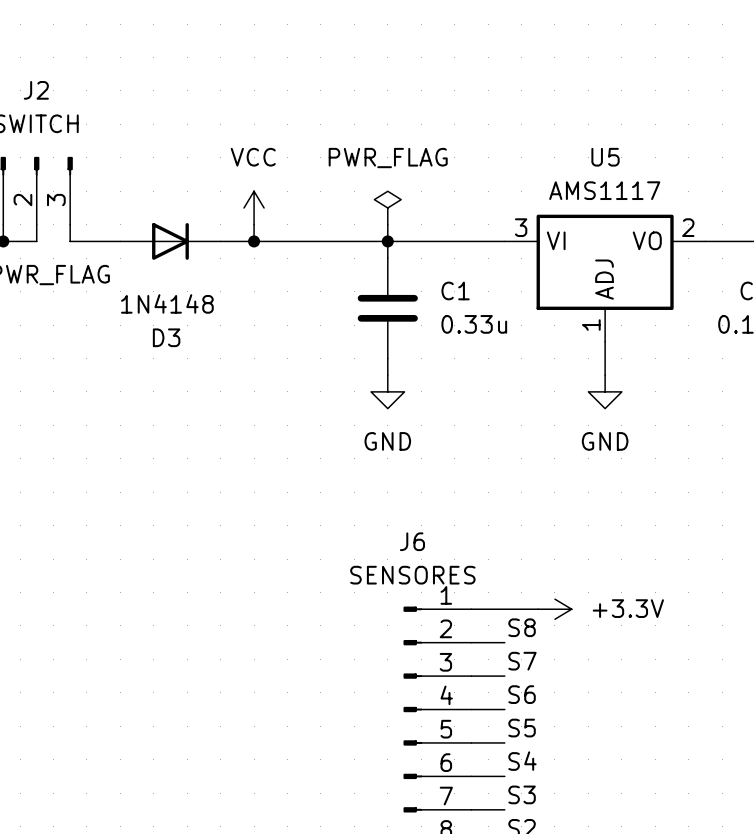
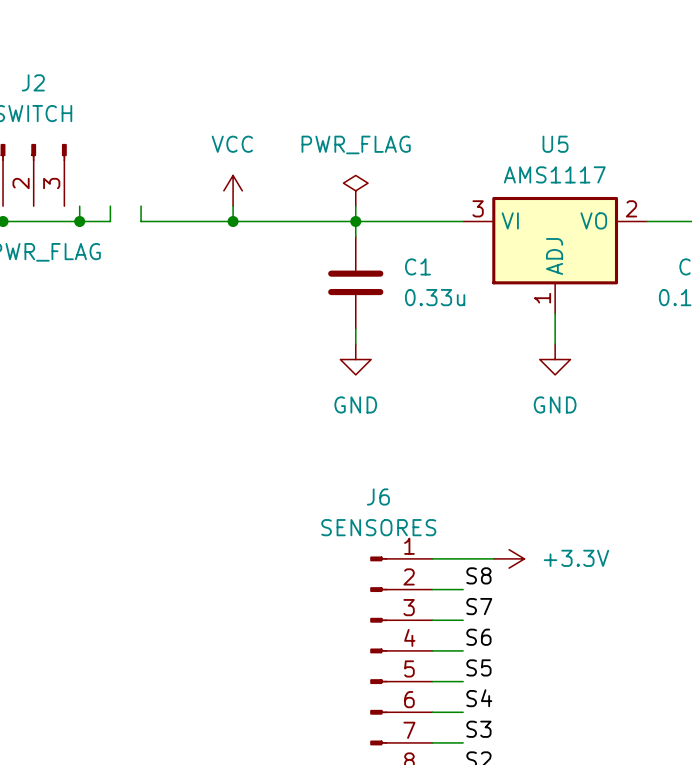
wire: (3, 224) (3, 241) -> (79, 206) (79, 221)
wire: (36, 224) (36, 241) -> (64, 221) (33, 221)
wire: (70, 224) (70, 241) -> (110, 206) (110, 221)
junction: none -> (79, 221)
D3: 1N4148 (170, 241) -> none

